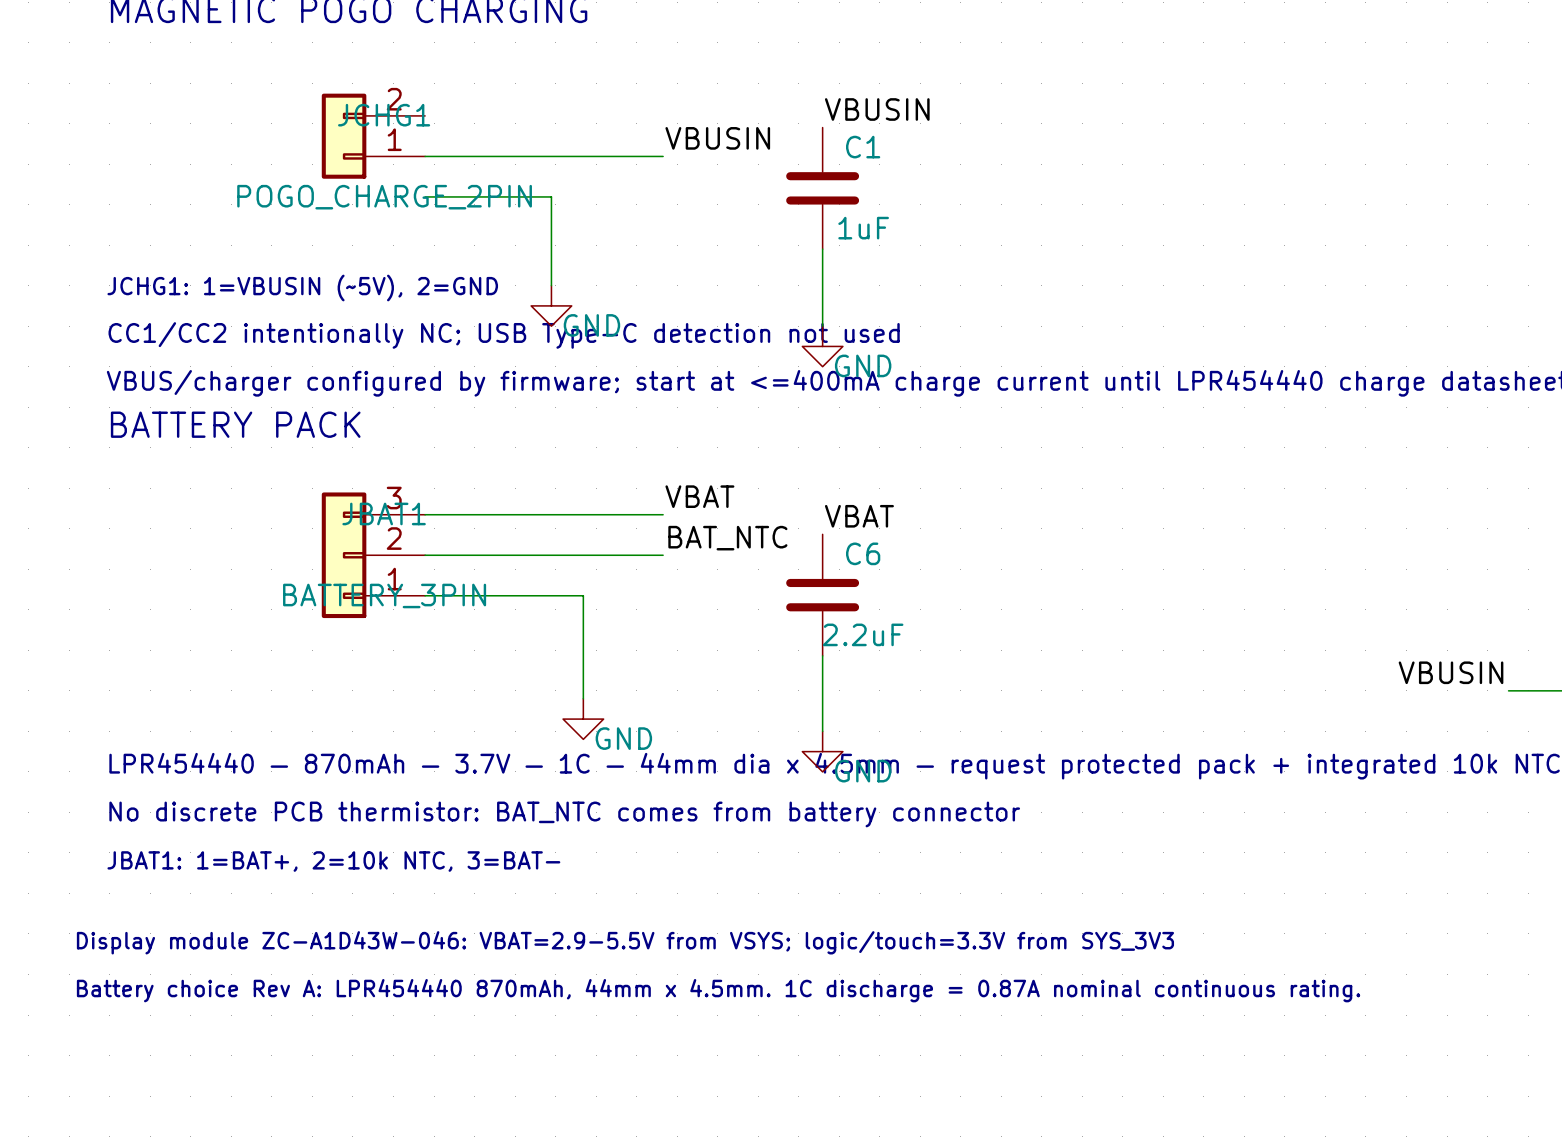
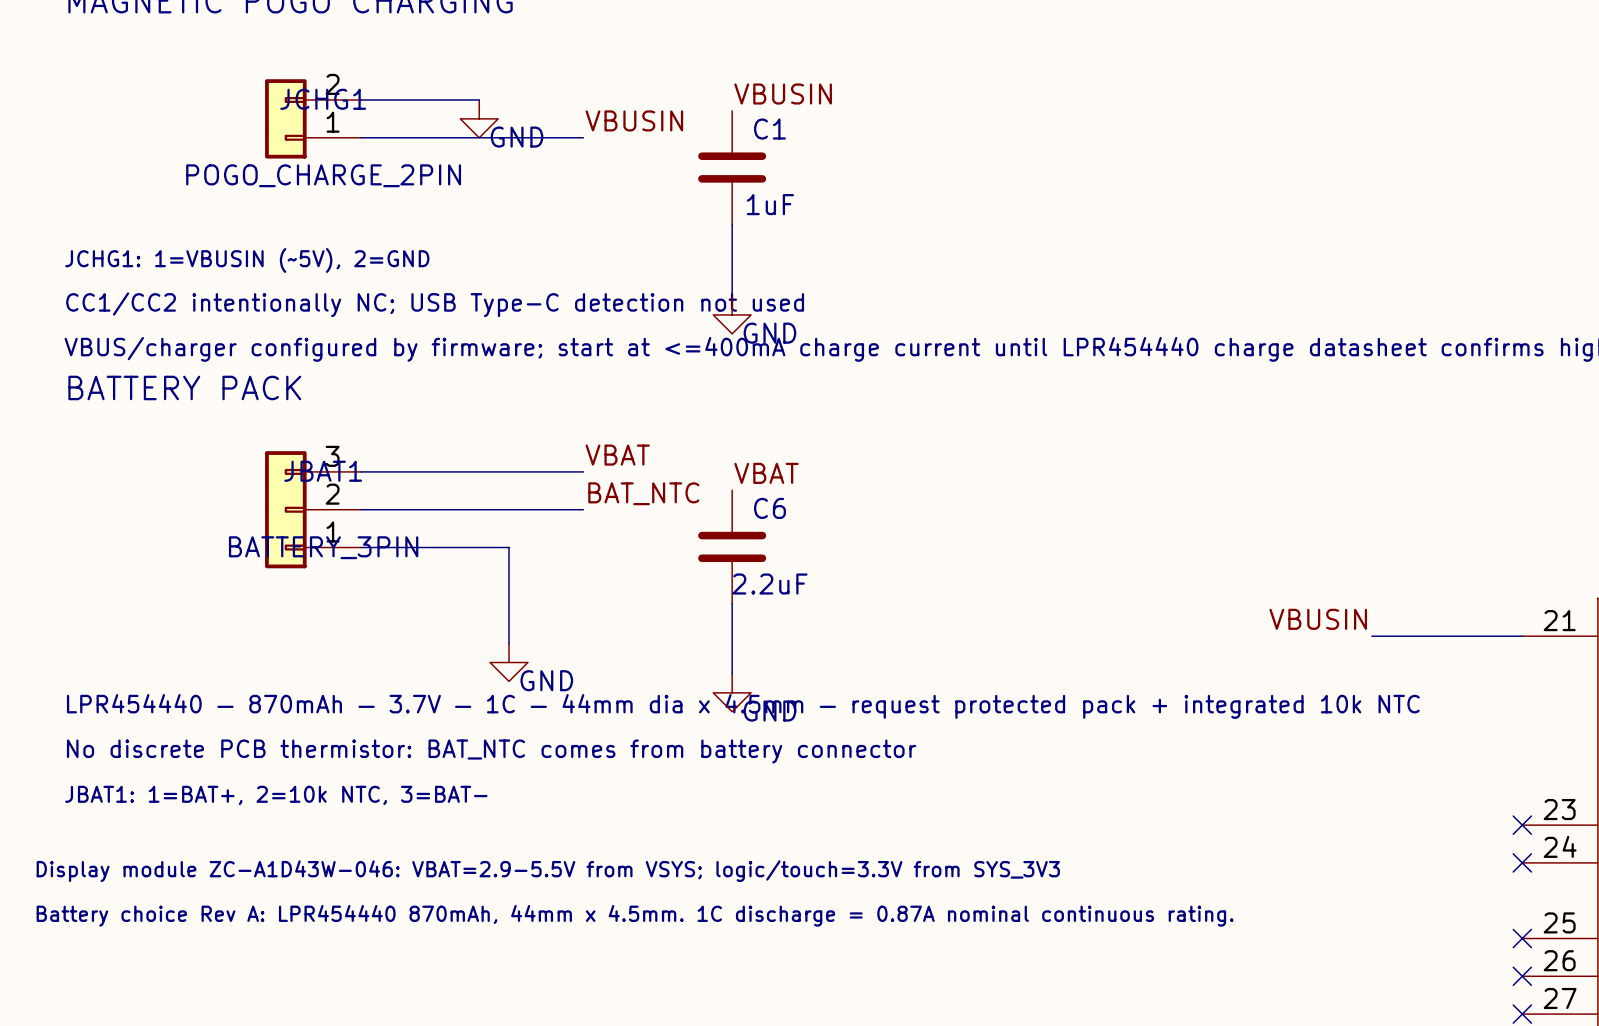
wire: none -> (361, 99) (479, 99)
wire: (425, 196) (551, 196) (551, 285) -> none
power symbol position: GND (551, 305) -> GND (479, 118)

